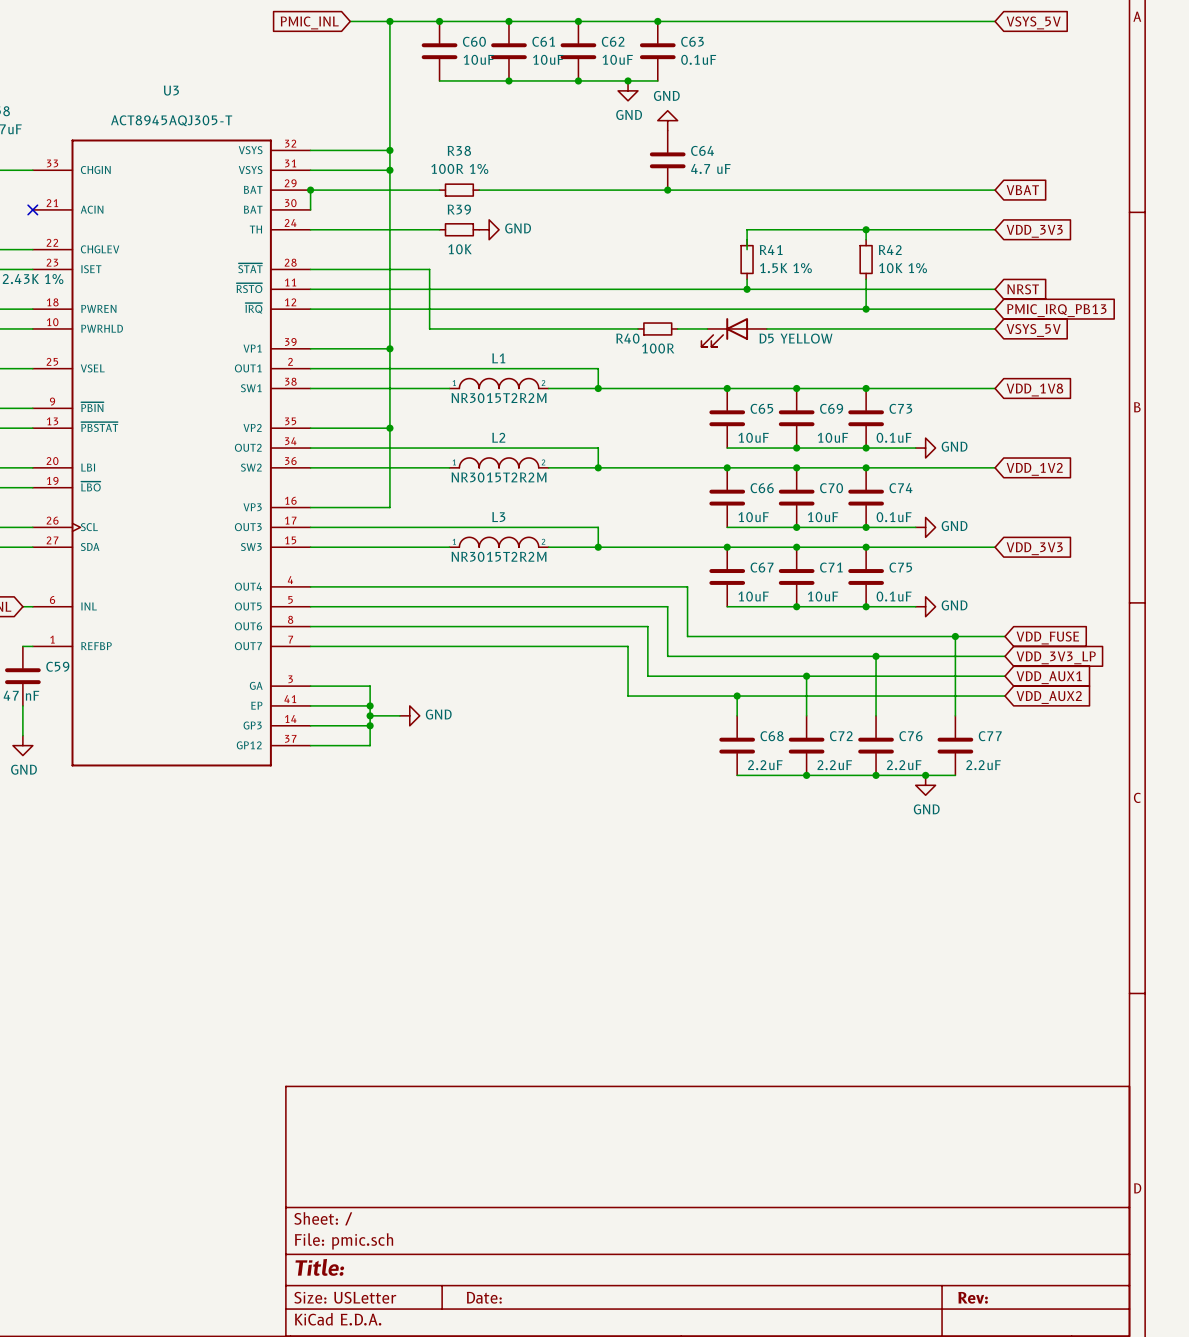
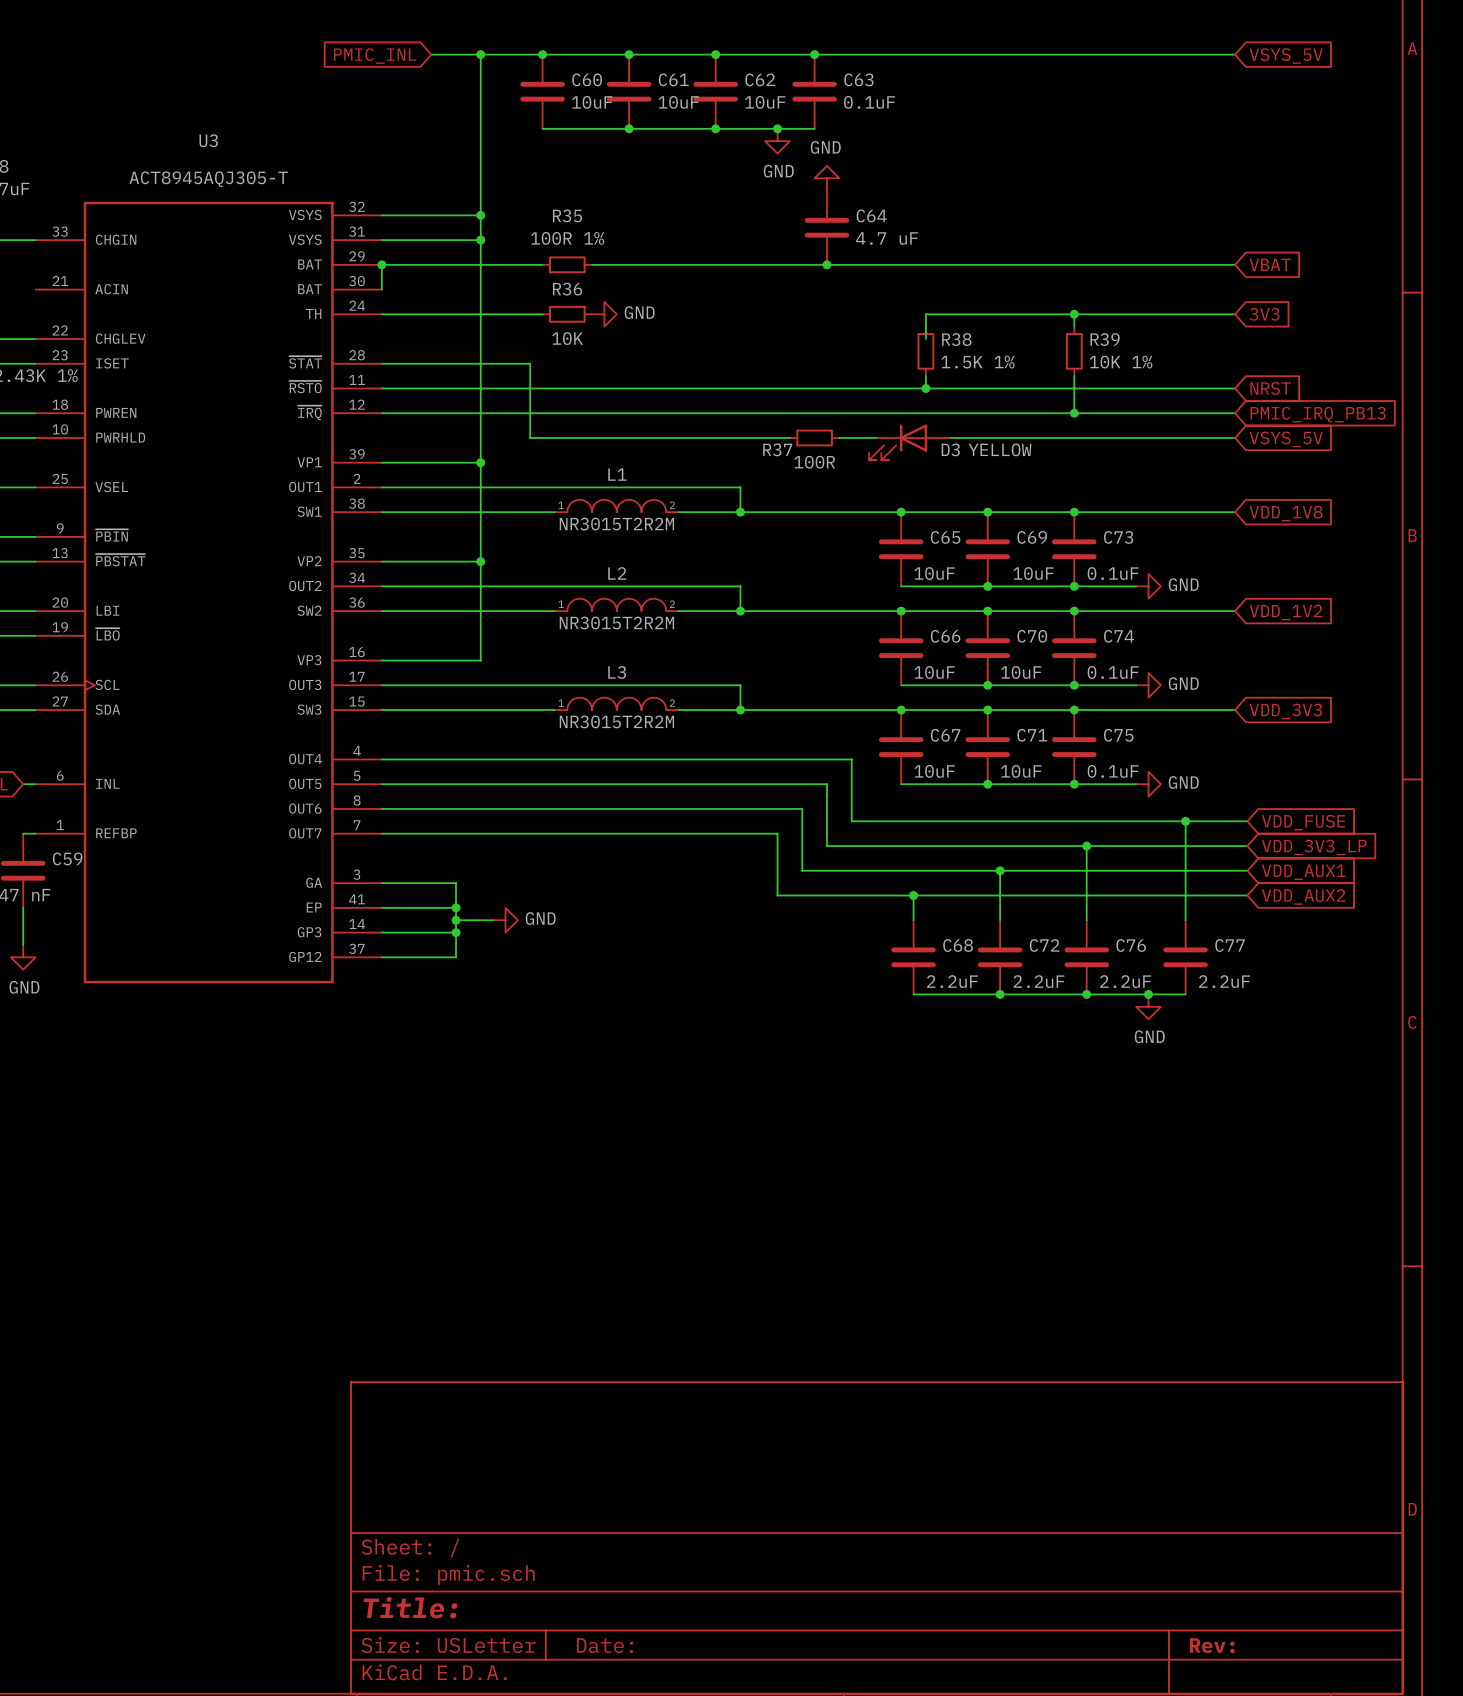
R38 name: R38 (459, 150) -> R35 (567, 215)
no-connect mark: (32, 209) -> none
R39 name: R39 (459, 209) -> R36 (567, 289)
global label: VDD_3V3 (1034, 231) -> 3V3 (1264, 314)
R41 name: R41 (771, 250) -> R38 (956, 339)
R42 name: R42 (890, 250) -> R39 (1105, 339)
R40 name: R40 (627, 338) -> R37 (777, 449)
D5 name: D5 (766, 338) -> D3 (950, 449)

